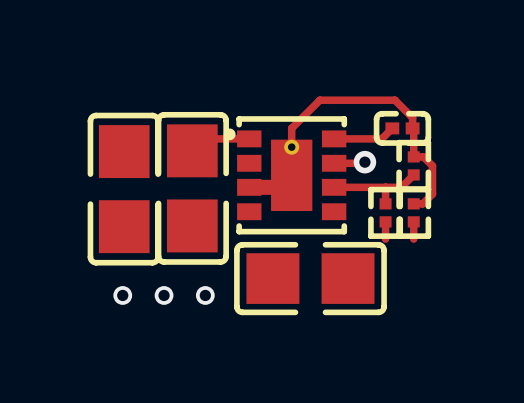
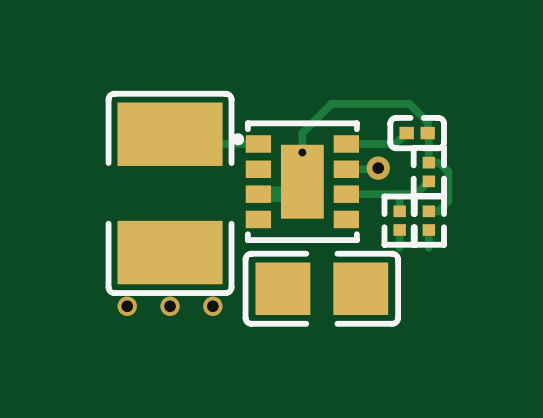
part: none -> (170, 193)
part: (192, 188) -> none
part: (124, 189) -> none

